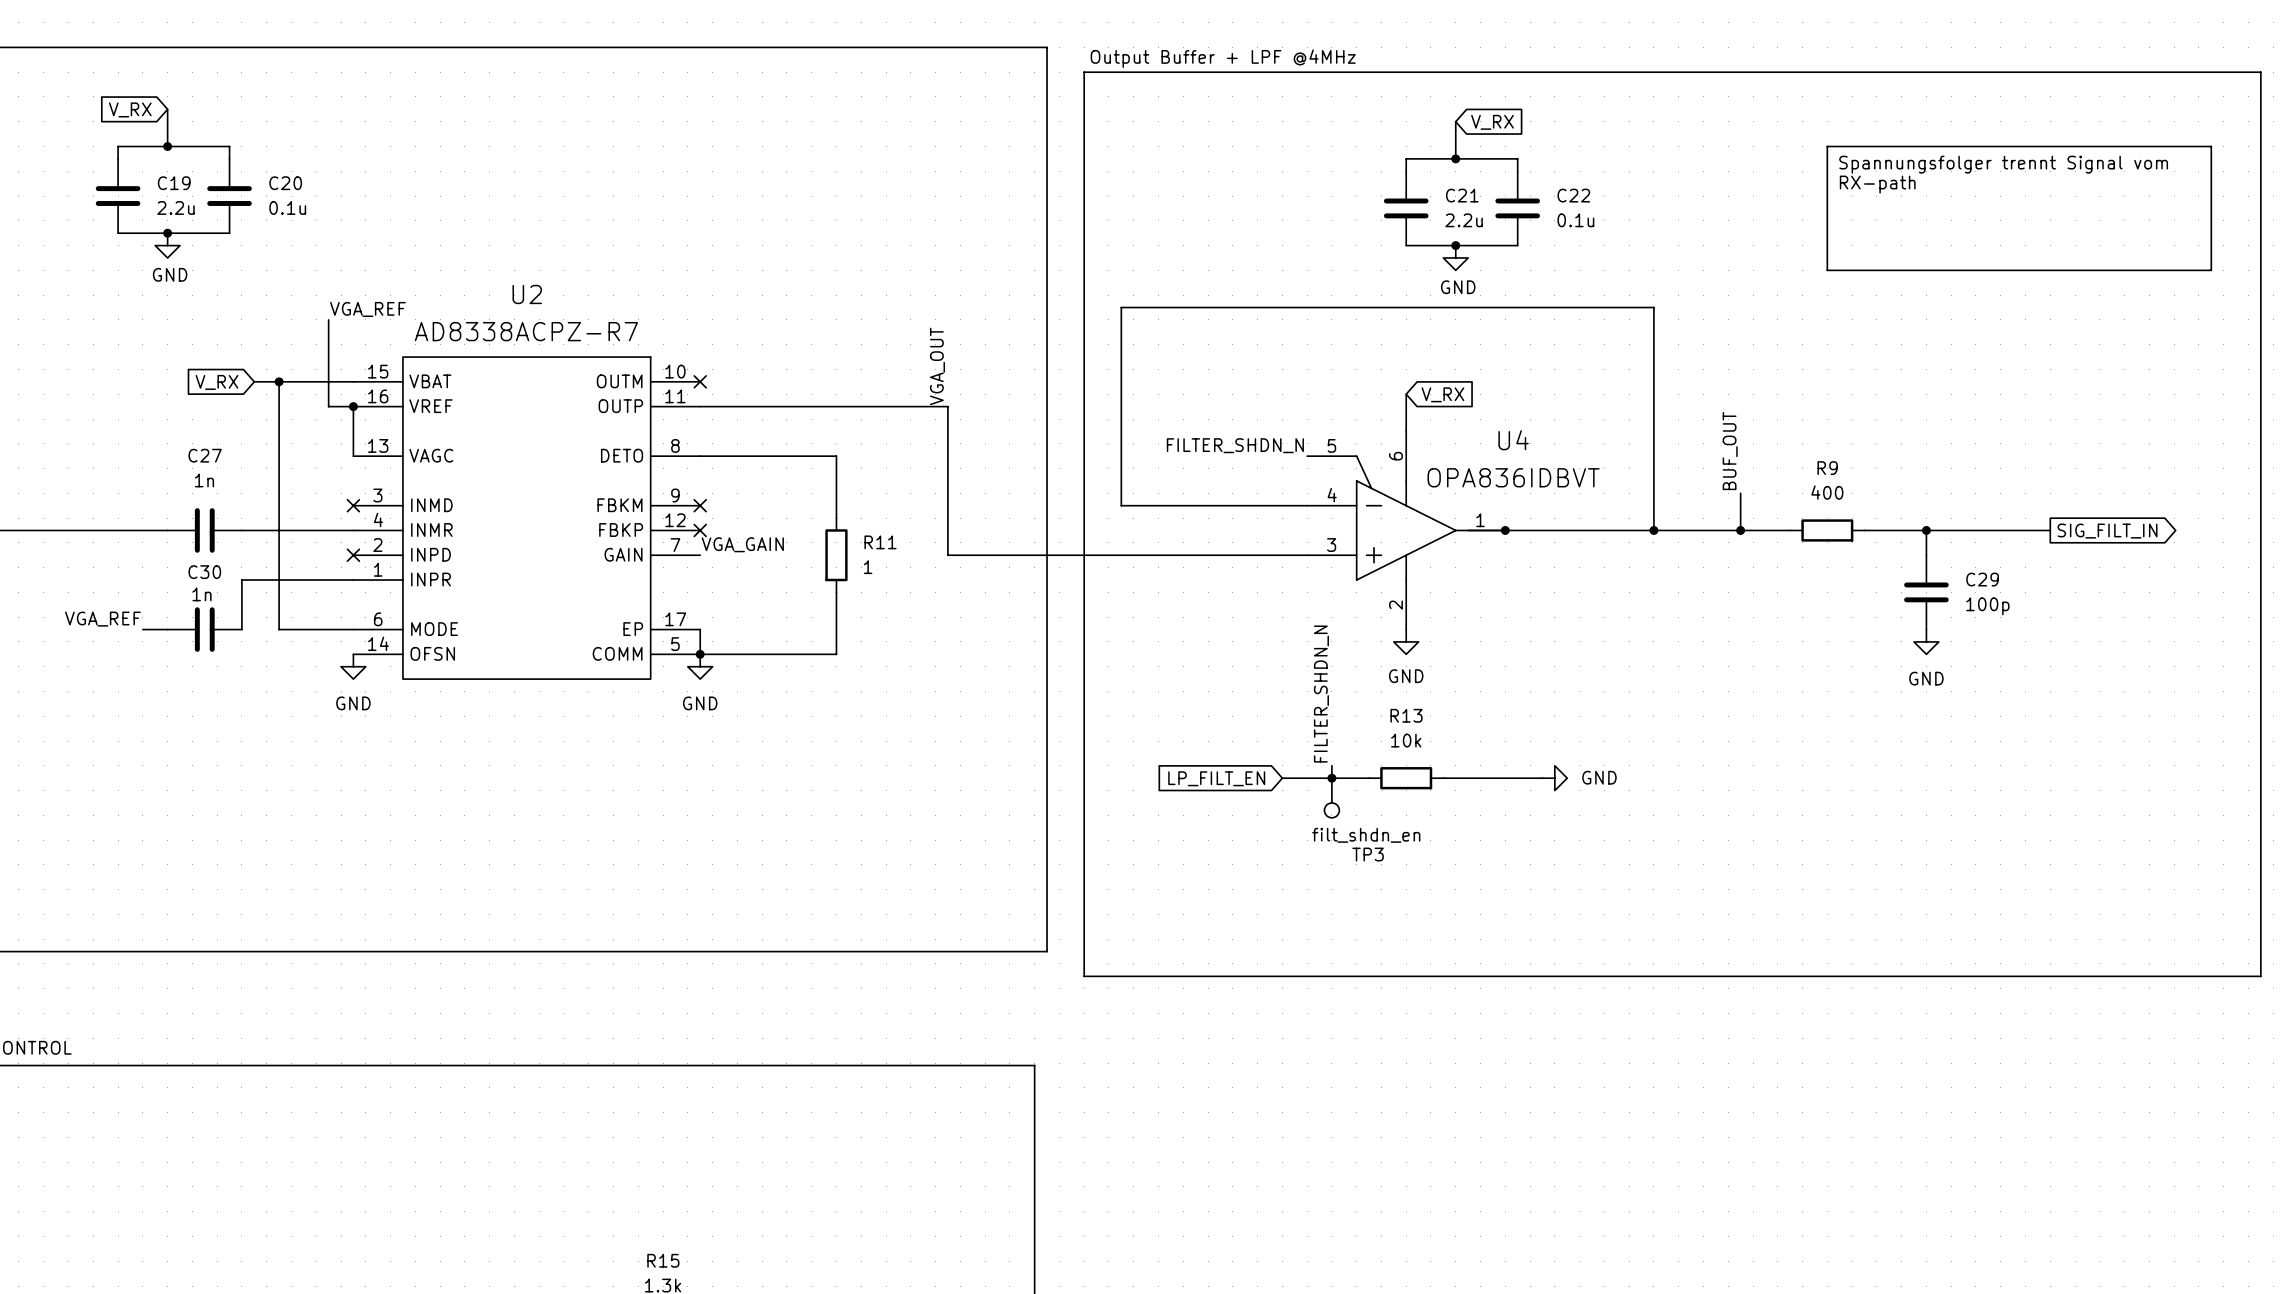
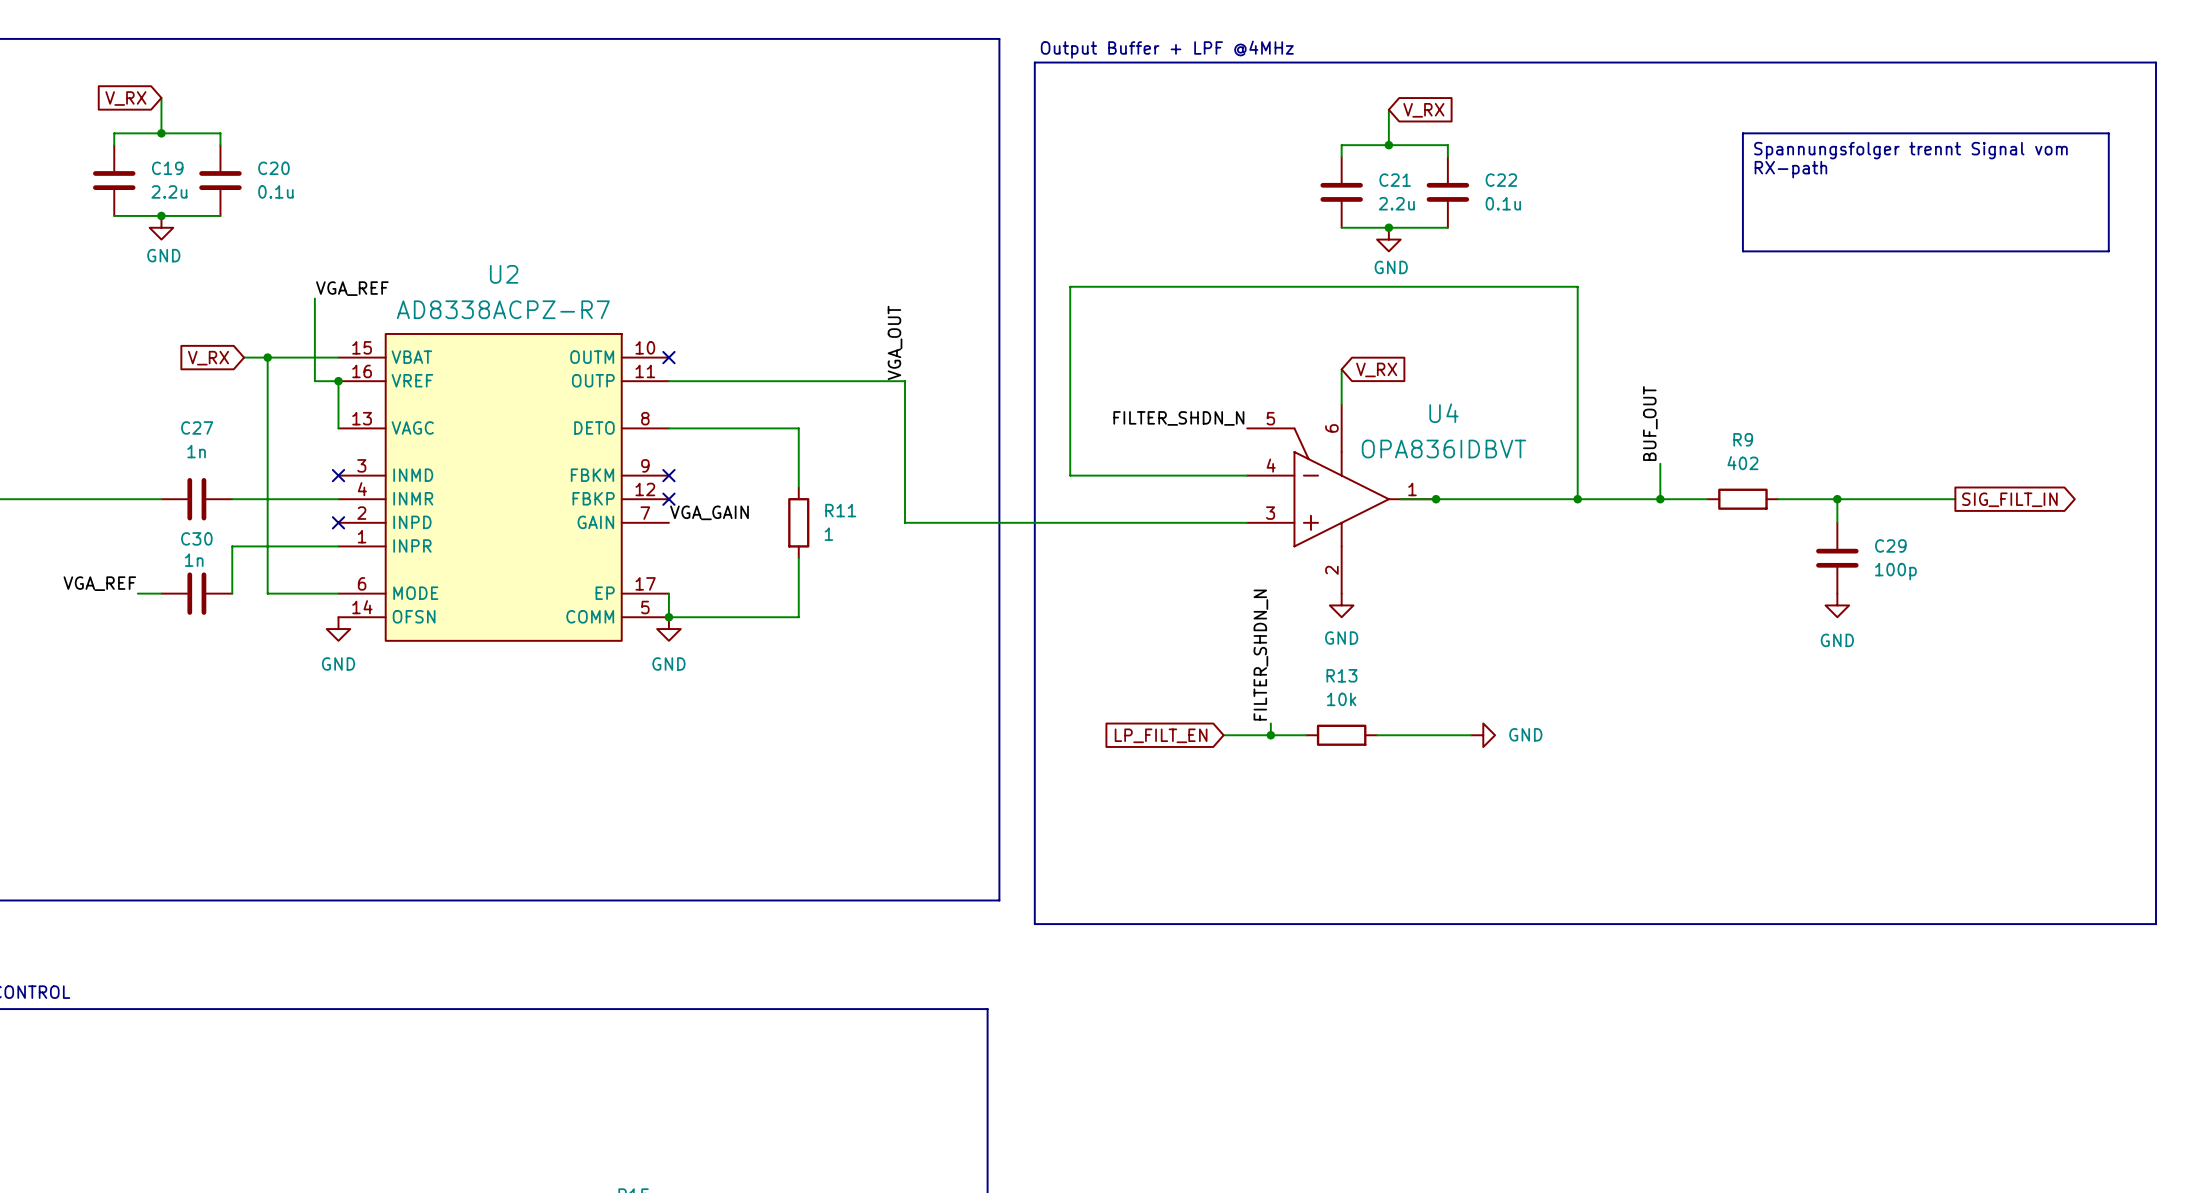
R9 value: 400 (1827, 492) -> 402 (1742, 463)
TP3: filt_shdn_en (1331, 798) -> none

